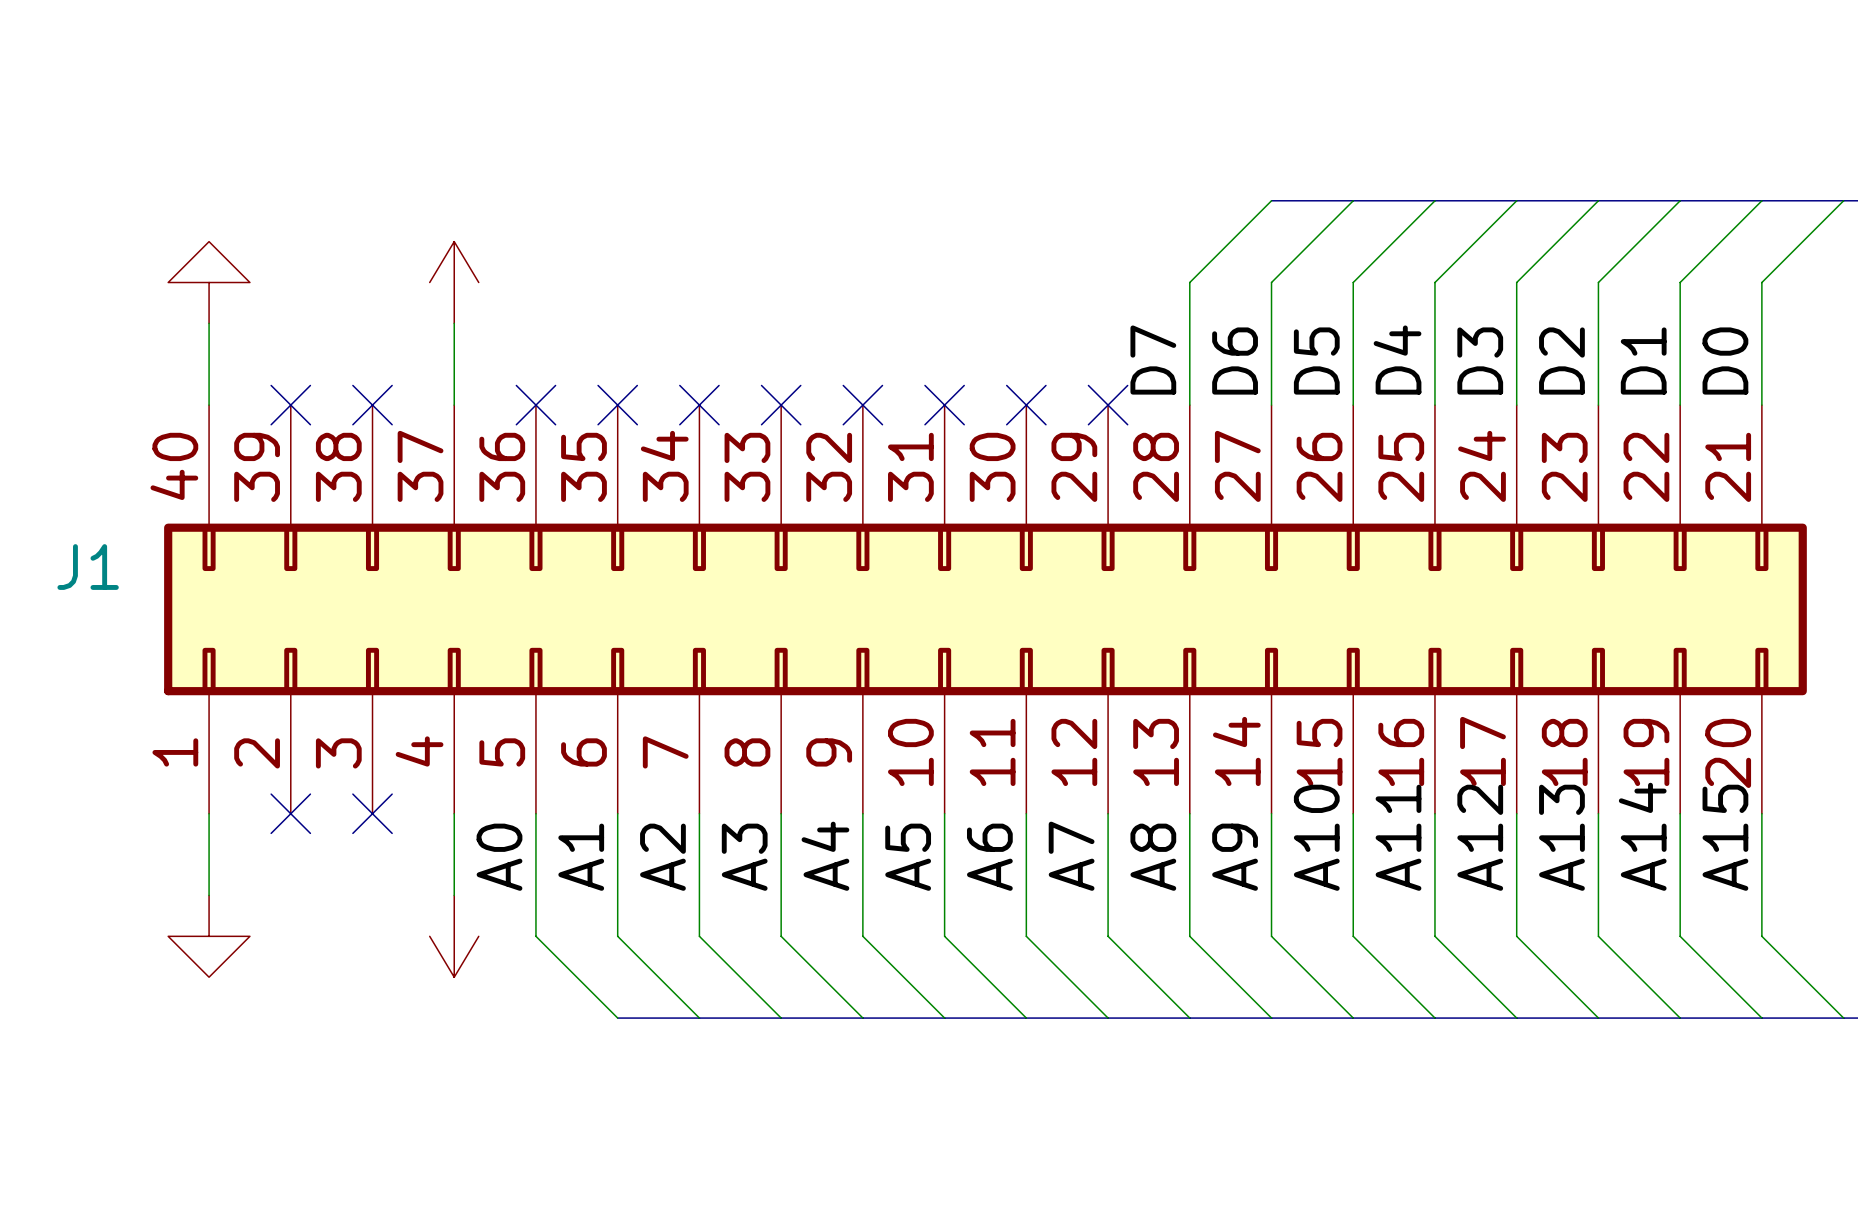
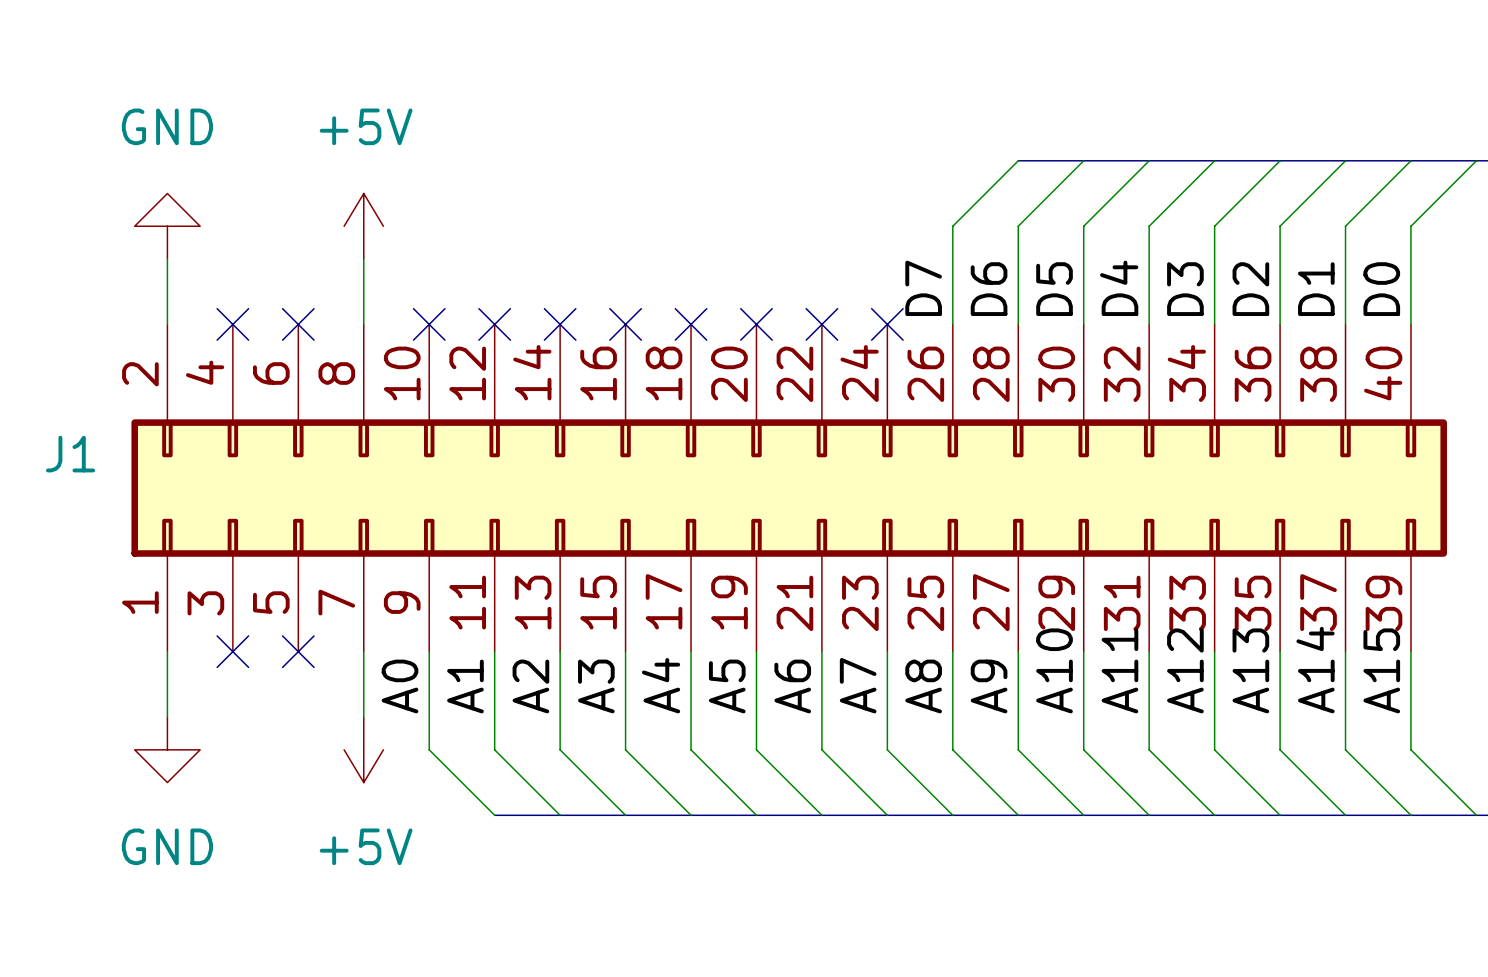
power symbol text: none -> GND (167, 126)
power symbol text: none -> +5V (366, 126)
J1 symbol: [164, 405, 1807, 814] -> [131, 324, 1447, 652]
power symbol text: none -> GND (167, 846)
power symbol text: none -> +5V (366, 846)

